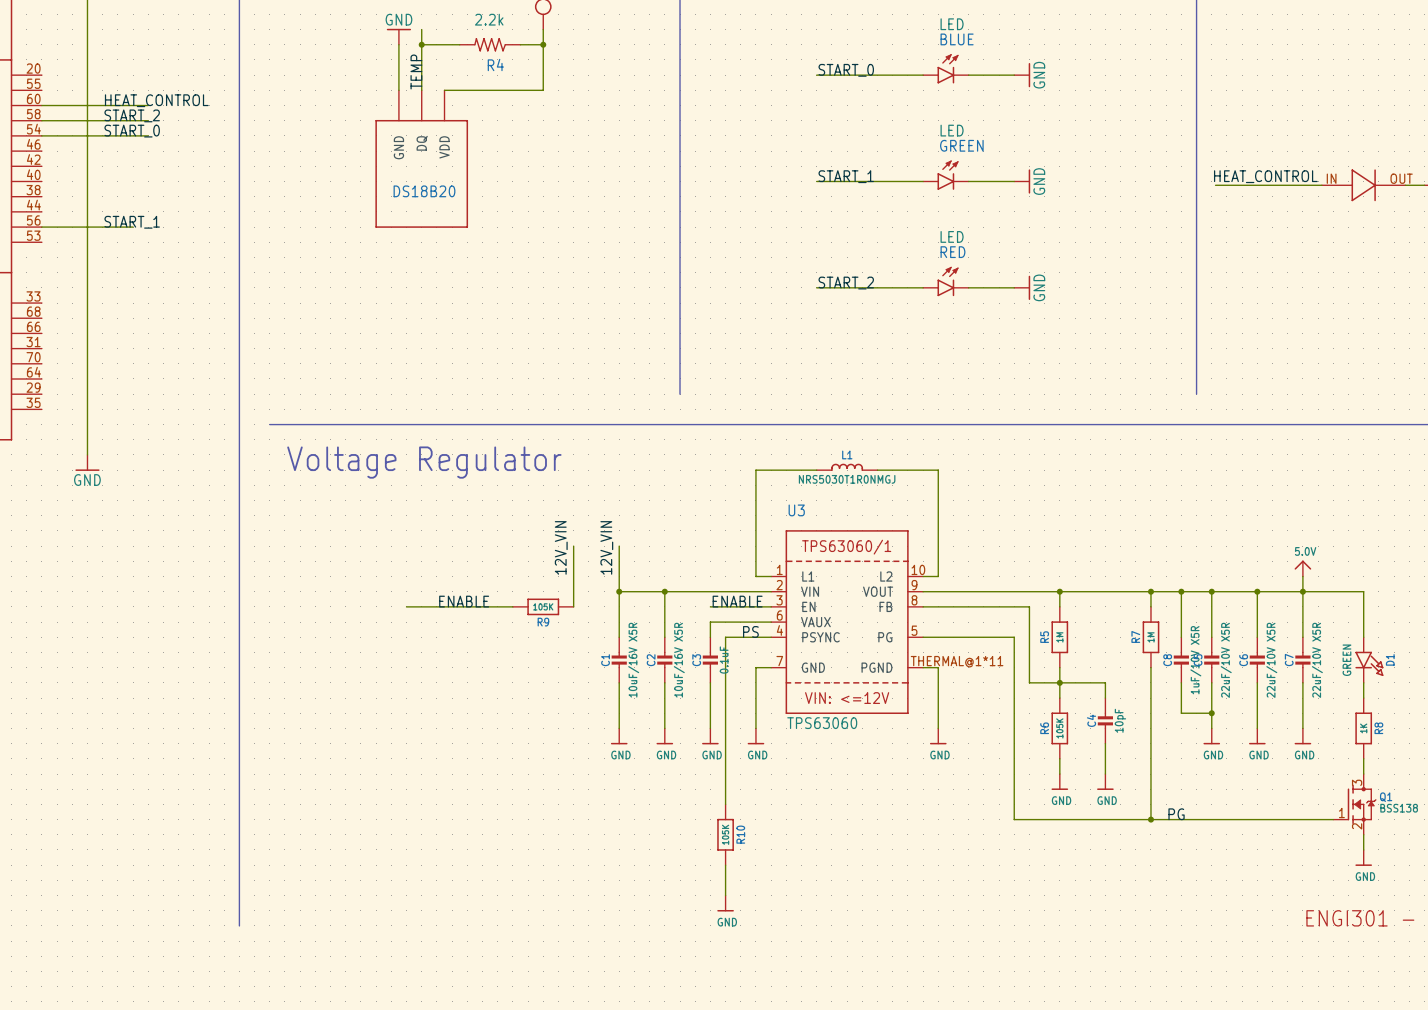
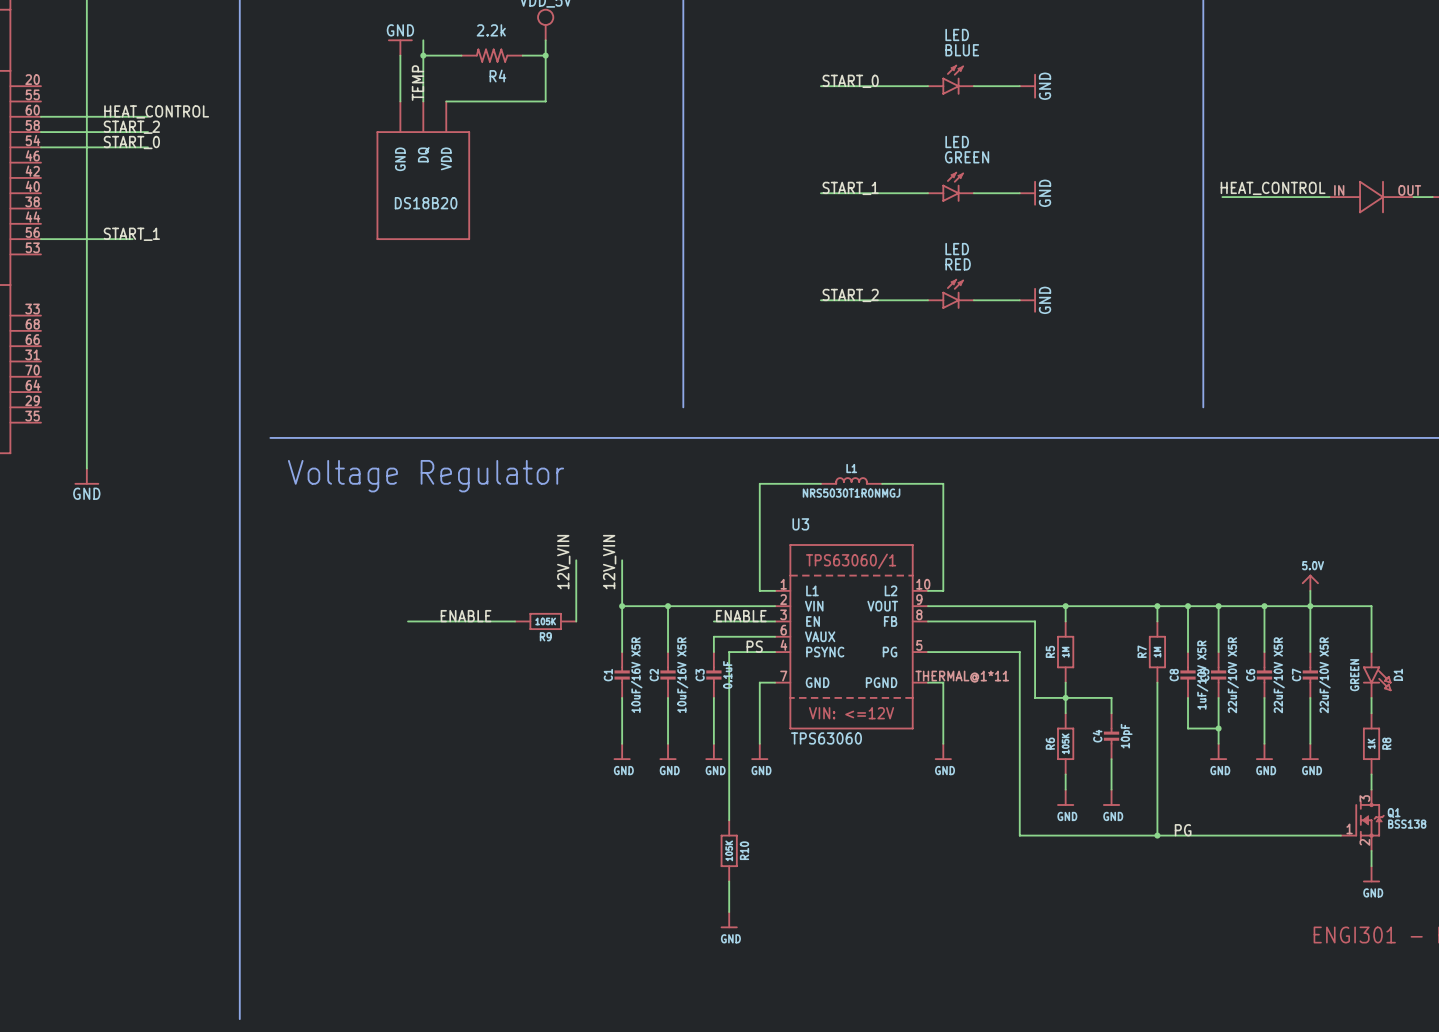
line: none -> (239, 942) (239, 1019)

